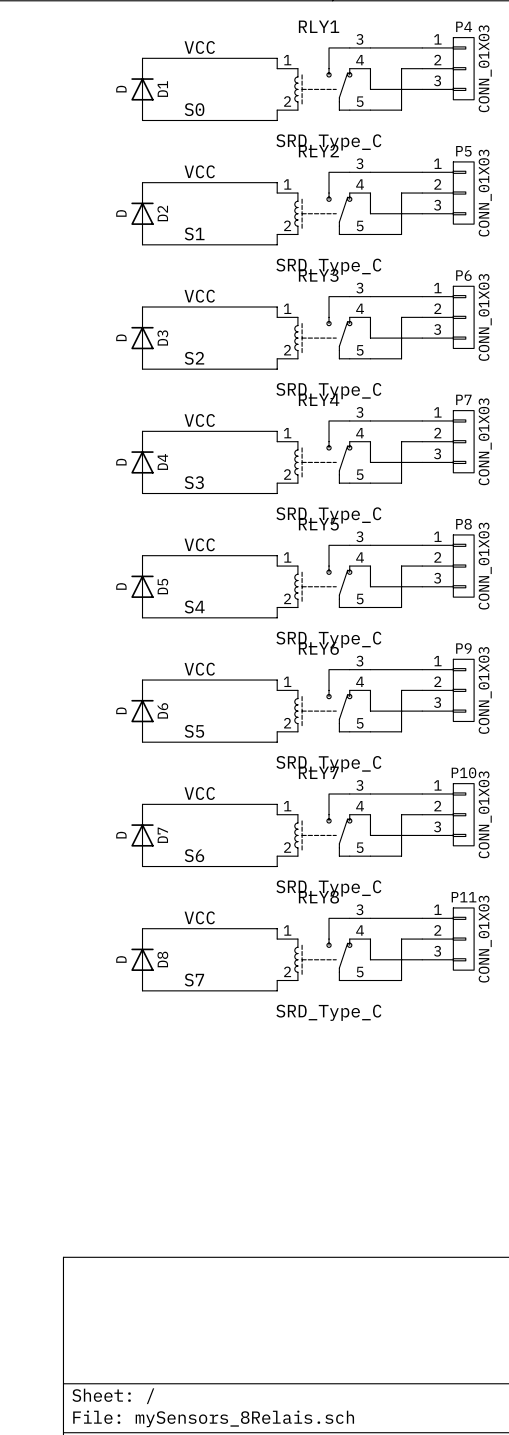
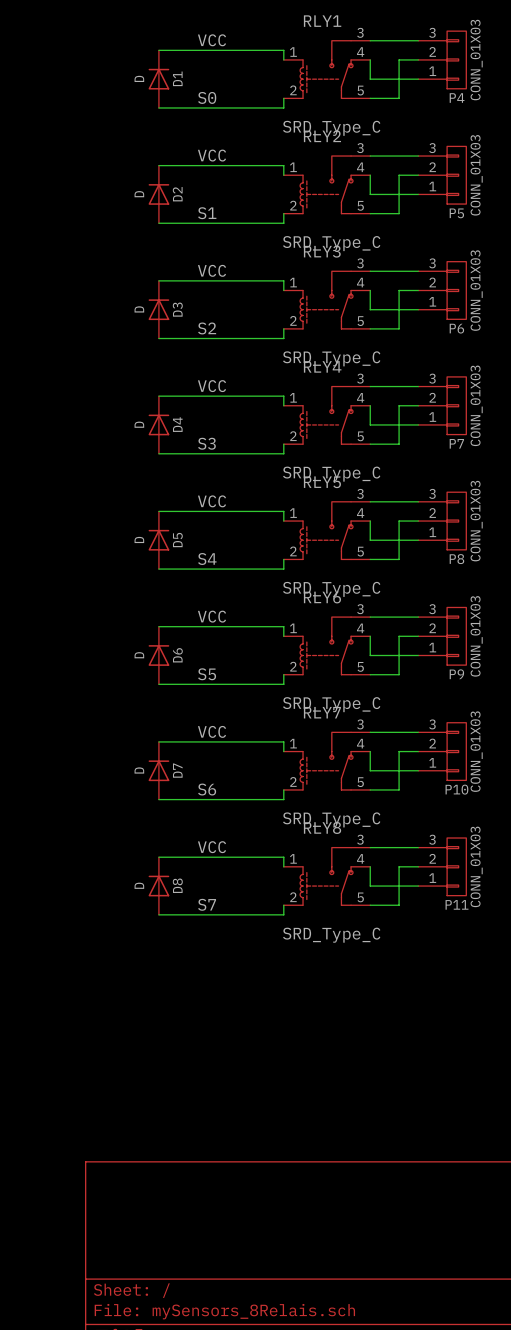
P4 flip: as is (463, 68) -> up-down (456, 59)
P5 flip: as is (463, 193) -> up-down (456, 175)
P6 flip: as is (463, 317) -> up-down (456, 290)
P7 flip: as is (463, 441) -> up-down (456, 405)
P8 flip: as is (463, 566) -> up-down (456, 521)
P9 flip: as is (463, 690) -> up-down (456, 636)
P10 flip: as is (463, 814) -> up-down (456, 751)
P11 flip: as is (463, 939) -> up-down (456, 866)

